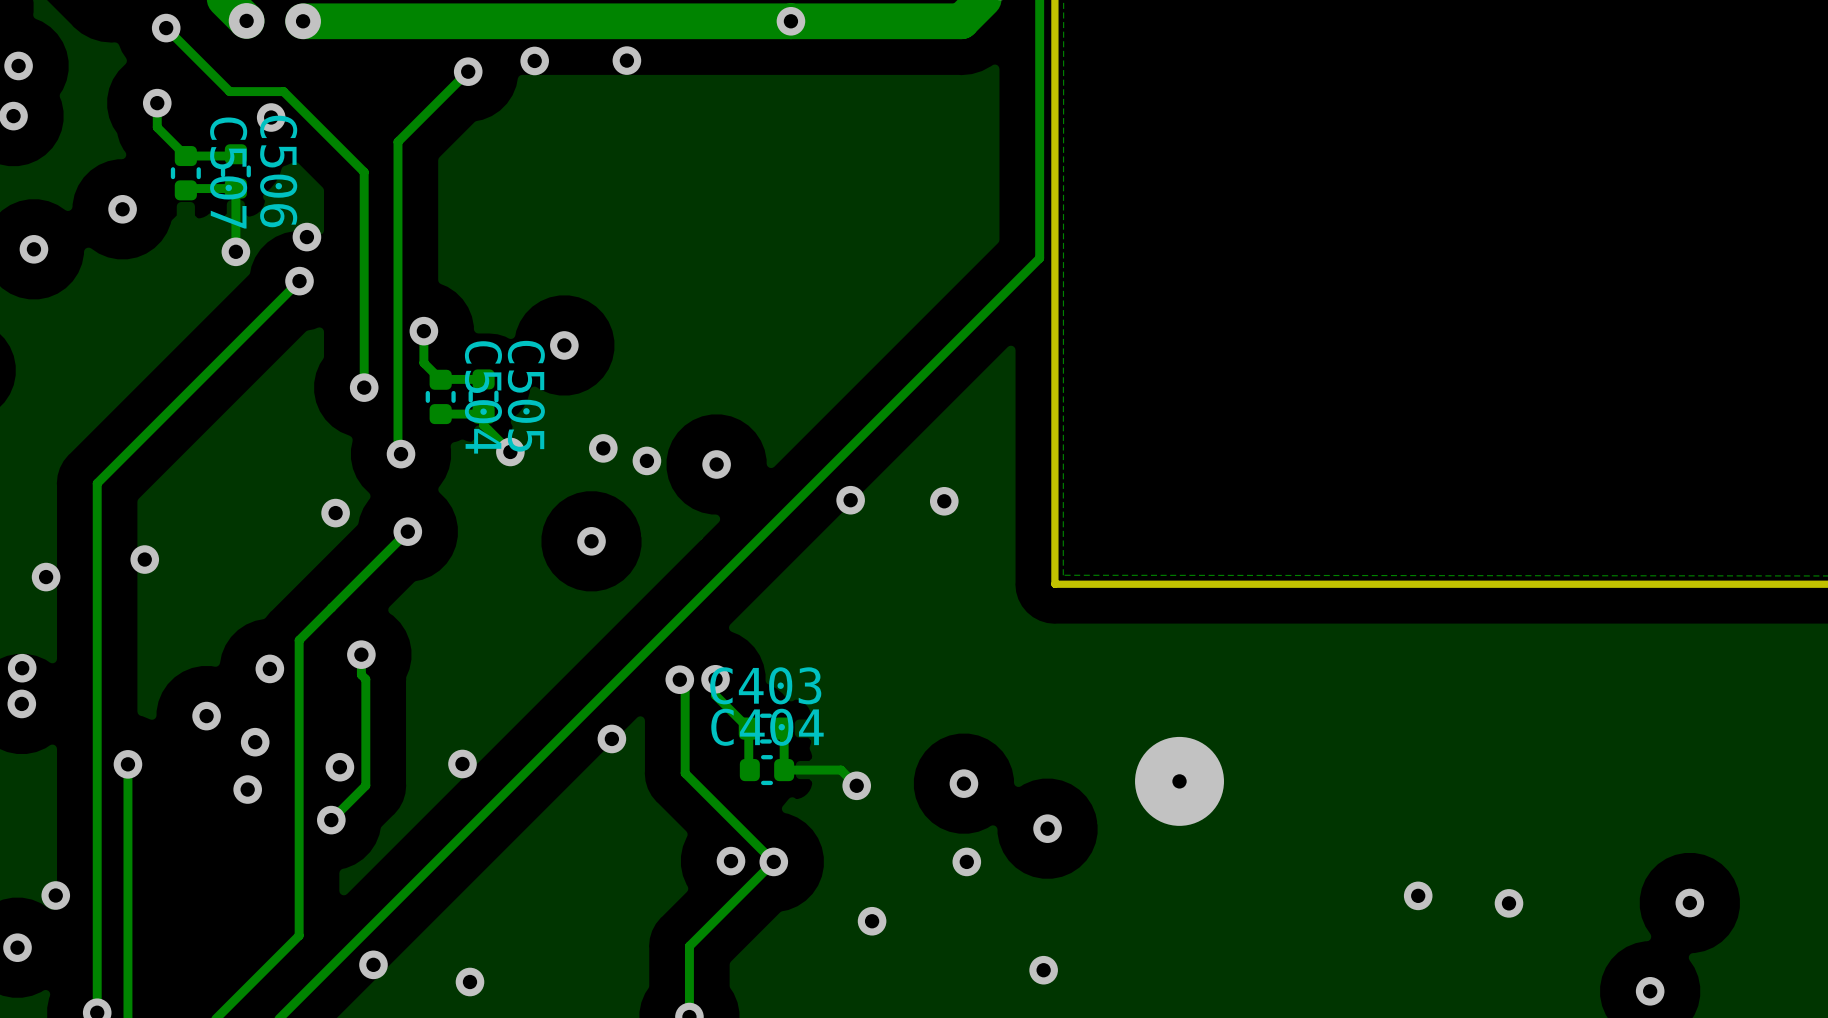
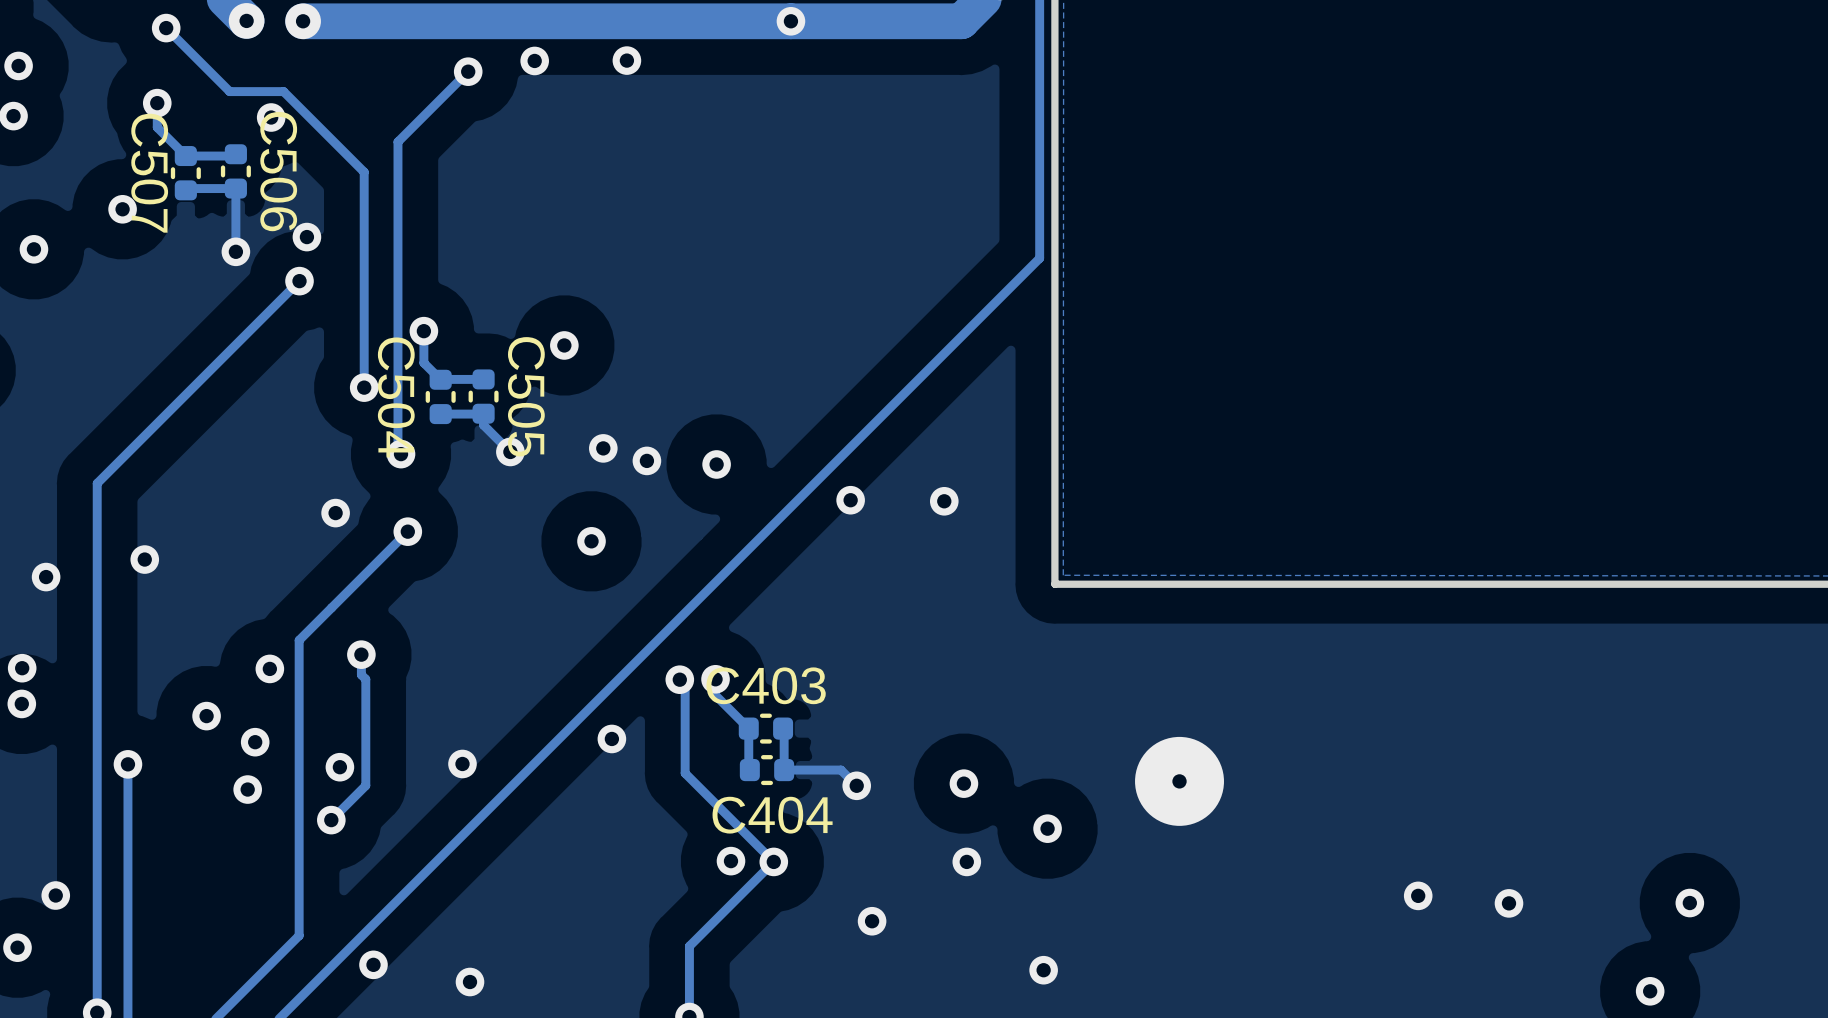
C507 name position: C507 (228, 173) -> C507 (149, 173)
C504 name position: C504 (483, 397) -> C504 (396, 397)
C404 name position: C404 (767, 727) -> C404 (772, 815)

